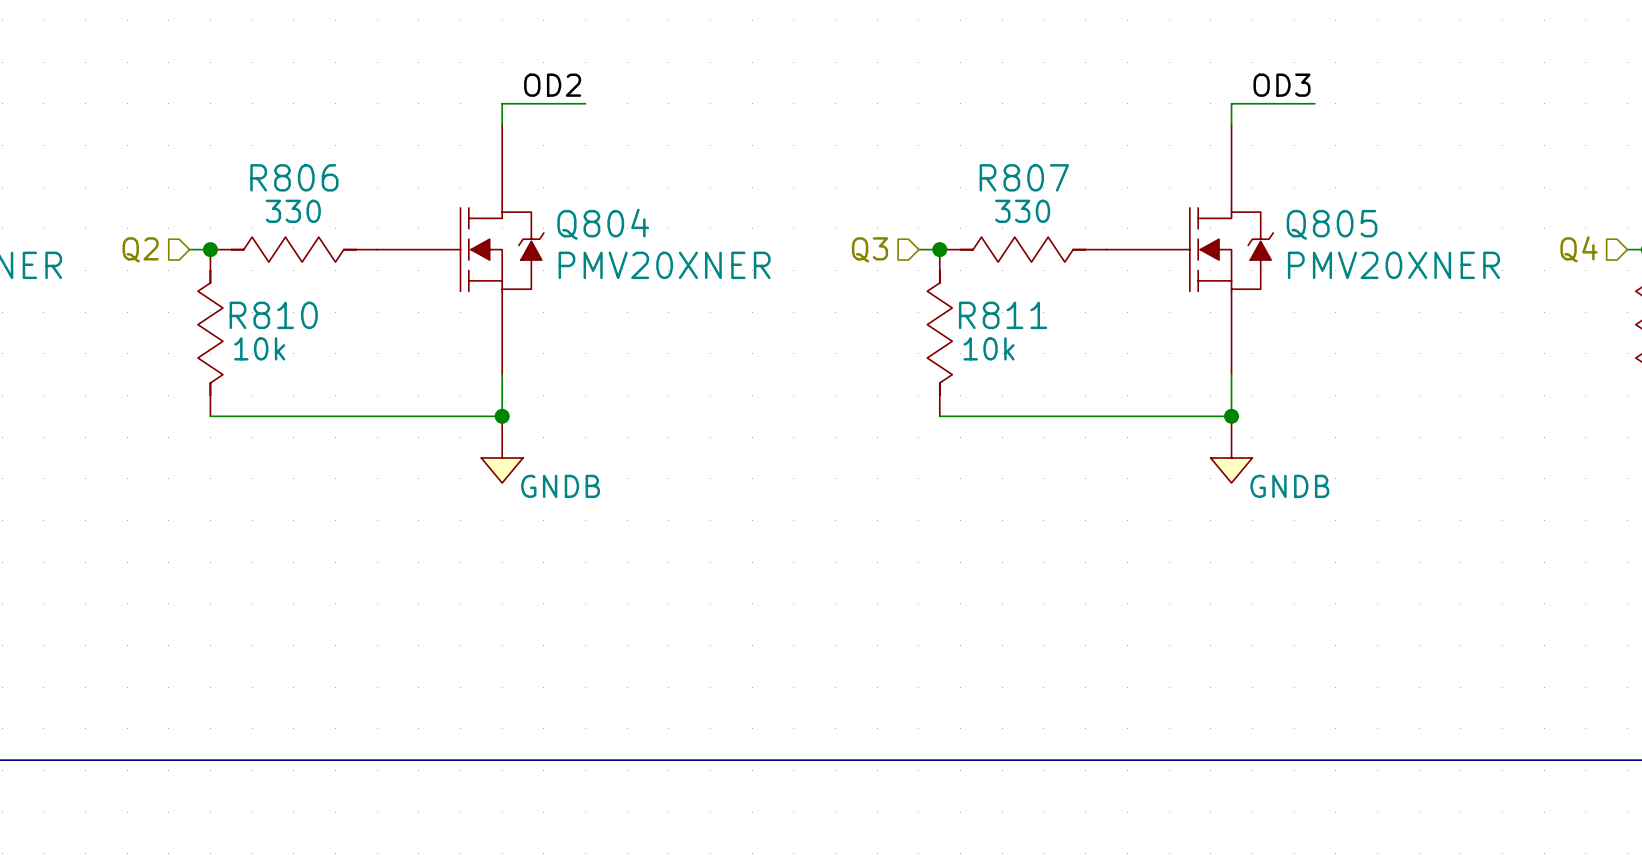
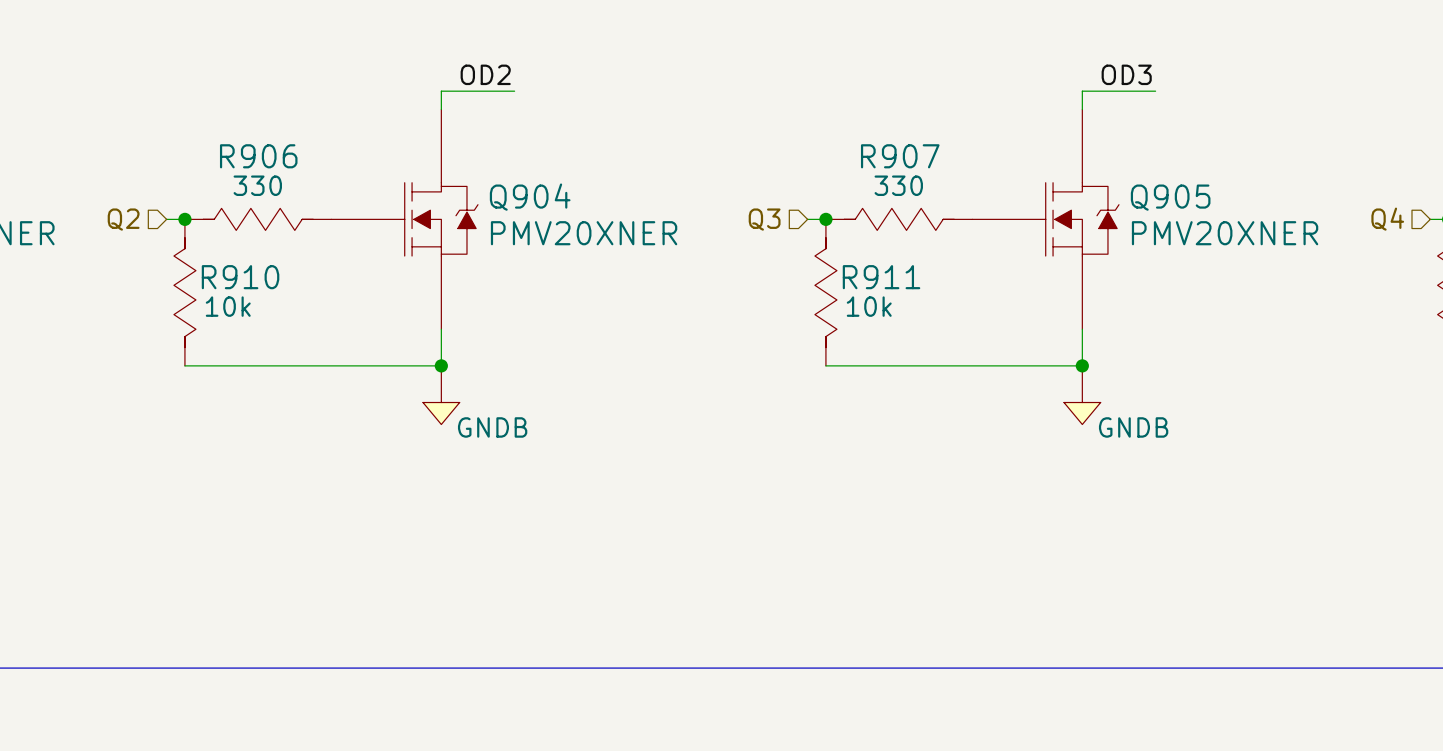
R806 name: R806 (294, 177) -> R906 (258, 156)
R807 name: R807 (1024, 177) -> R907 (900, 156)
Q804 name: Q804 (603, 224) -> Q904 (530, 197)
Q805 name: Q805 (1332, 224) -> Q905 (1170, 197)
R810 name: R810 (273, 315) -> R910 (240, 277)
R811 name: R811 (1003, 315) -> R911 (881, 277)

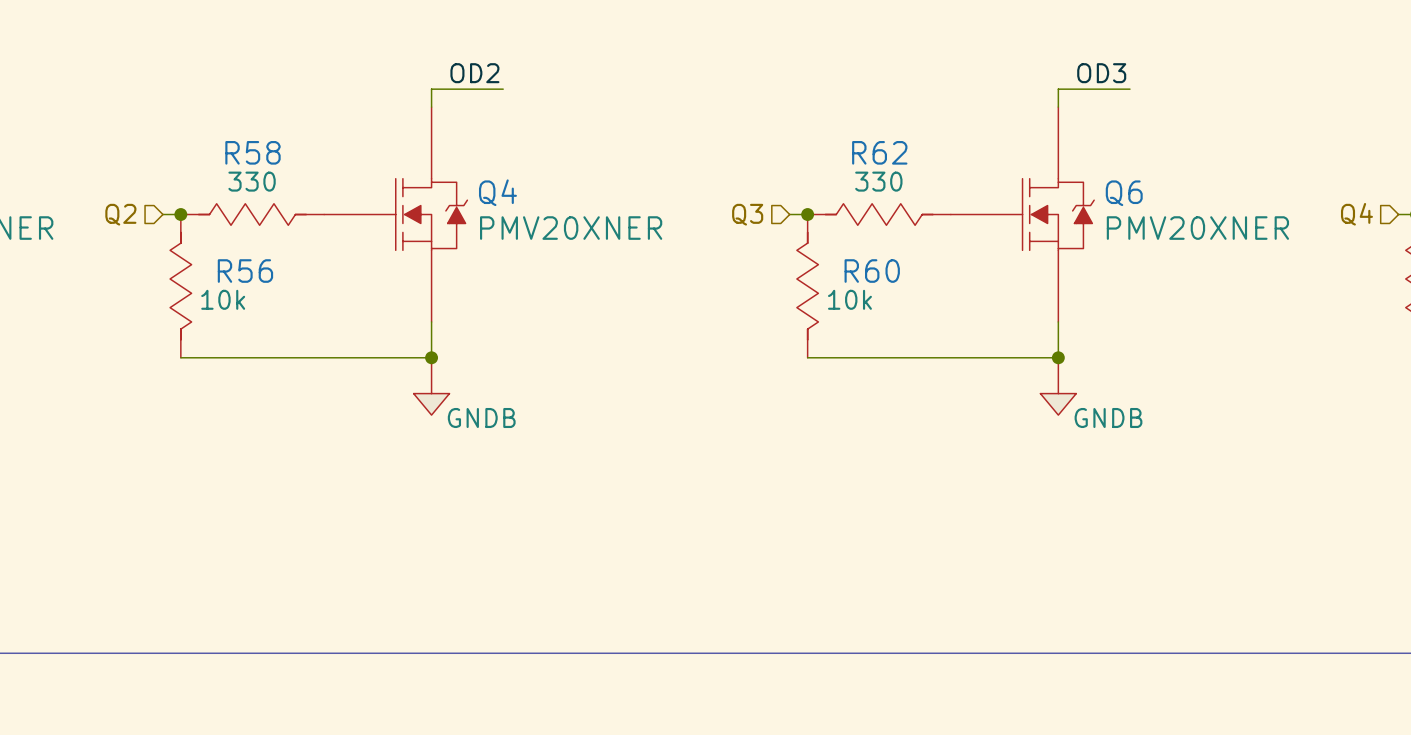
R906 name: R906 (258, 156) -> R58 (252, 152)
R907 name: R907 (900, 156) -> R62 (879, 152)
Q904 name: Q904 (530, 197) -> Q4 (497, 192)
Q905 name: Q905 (1170, 197) -> Q6 (1124, 193)
R910 name: R910 (240, 277) -> R56 (245, 271)
R911 name: R911 (881, 277) -> R60 (872, 271)

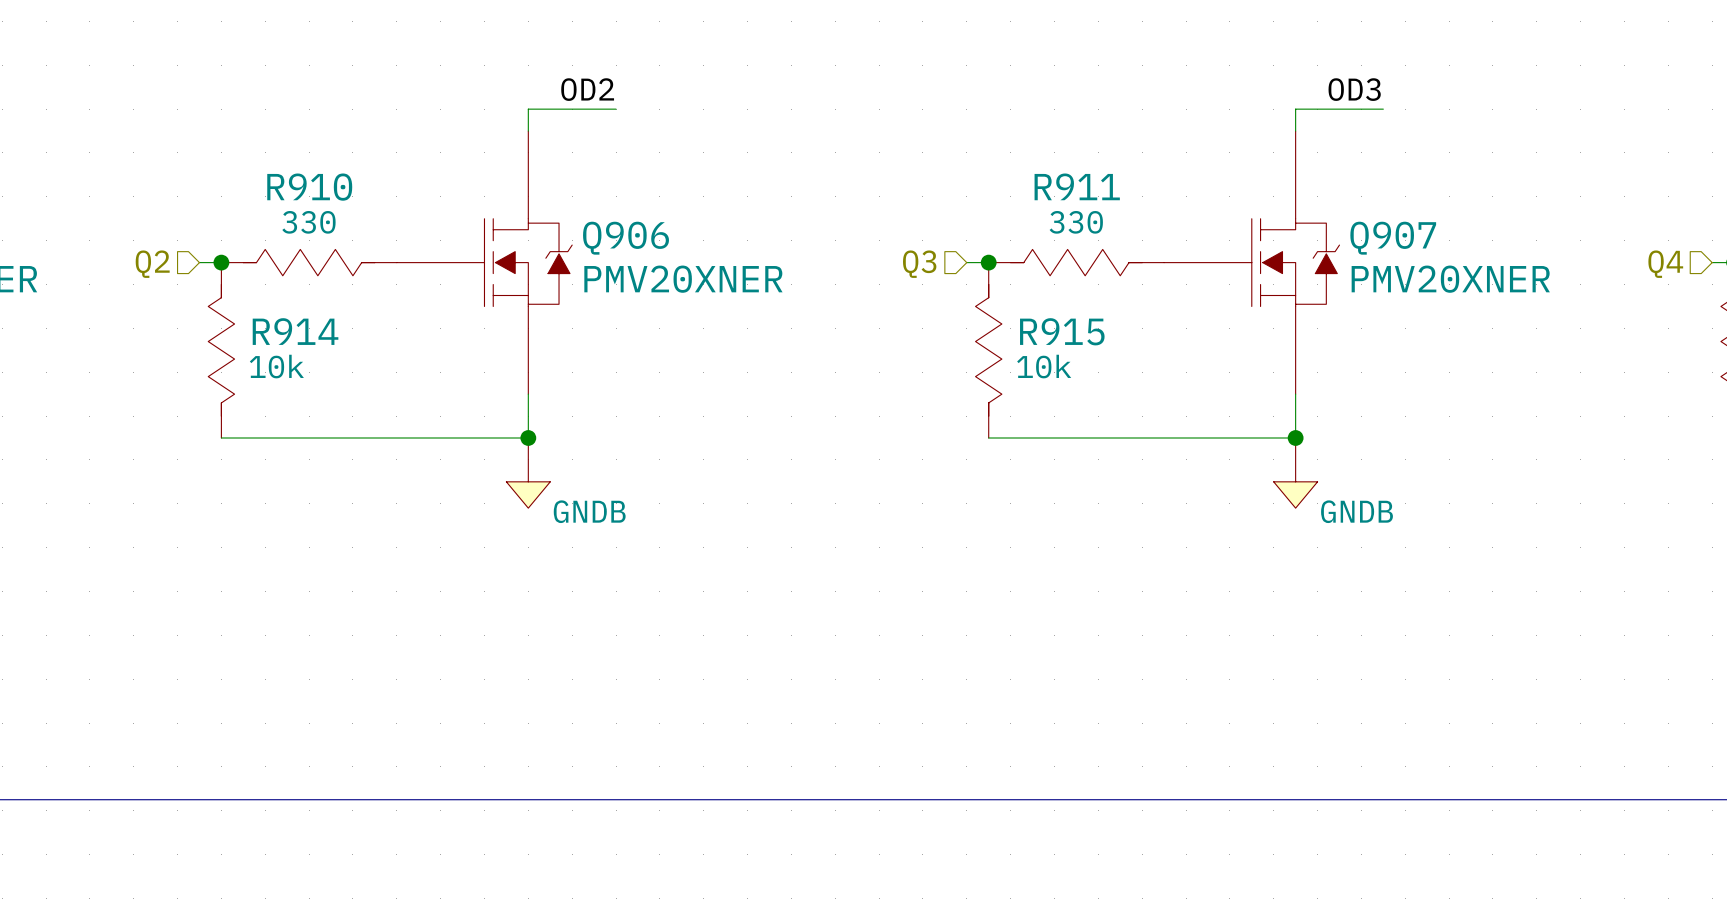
R58 name: R58 (252, 152) -> R910 (309, 187)
R62 name: R62 (879, 152) -> R911 (1077, 186)
Q4 name: Q4 (497, 192) -> Q906 (626, 238)
Q6 name: Q6 (1124, 193) -> Q907 (1393, 238)
R56 name: R56 (245, 271) -> R914 (295, 331)
R60 name: R60 (872, 271) -> R915 (1062, 331)

